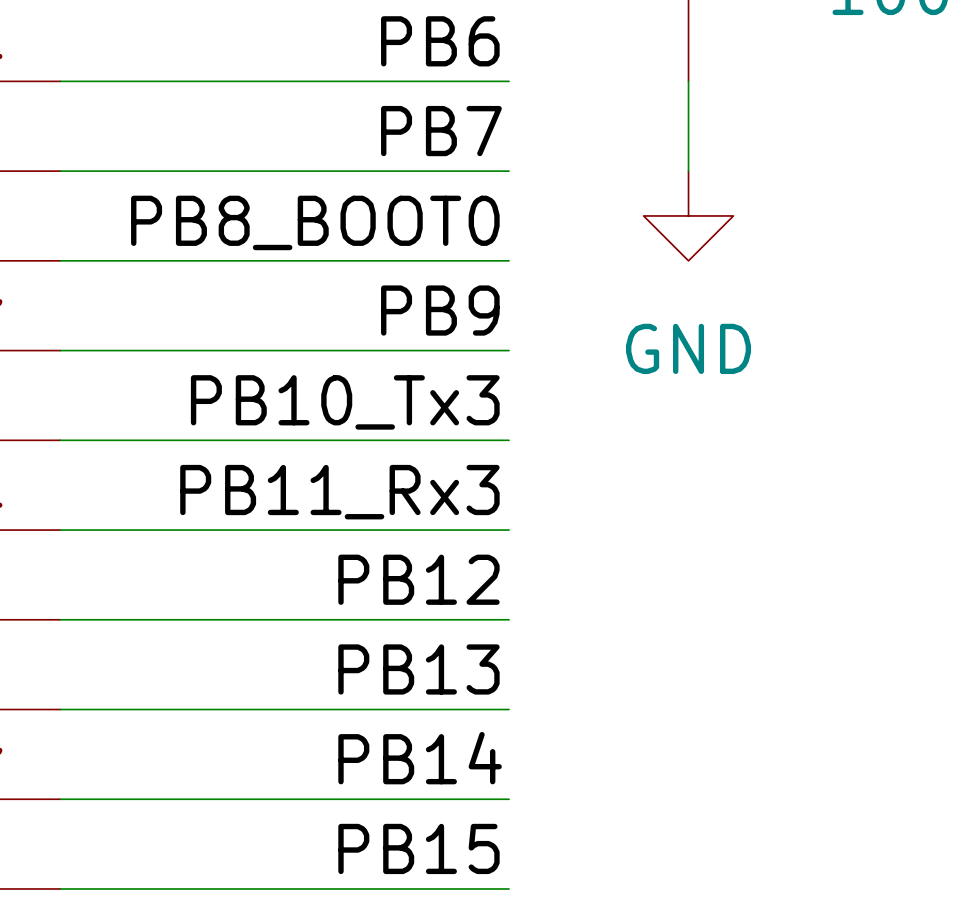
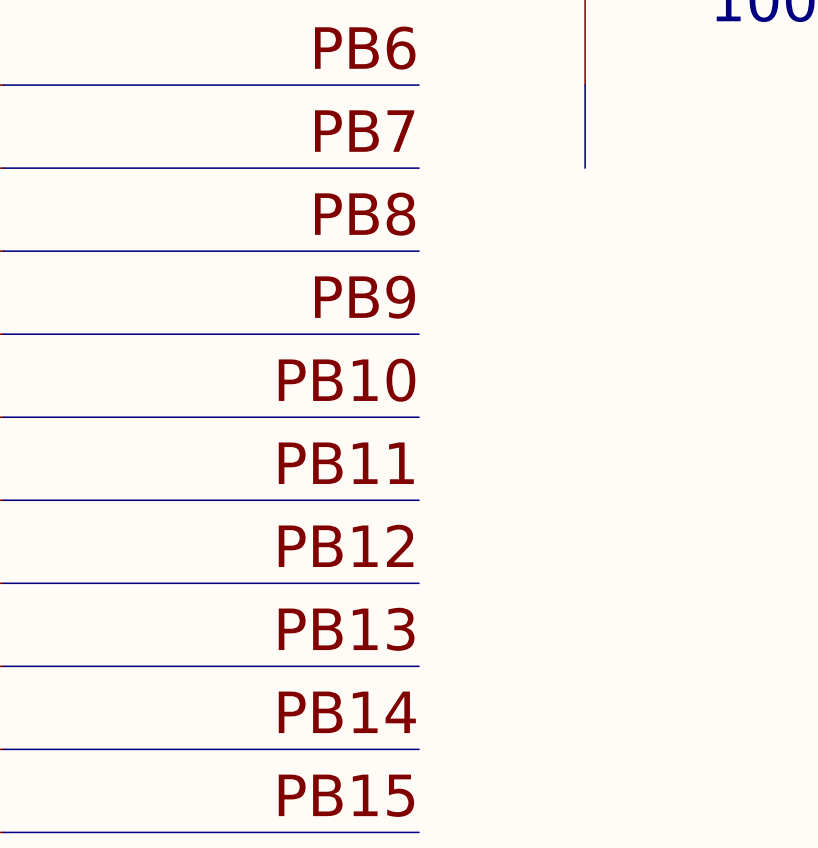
power symbol: GND (688, 215) -> none
label: PB8_BOOT0 (315, 222) -> PB8 (365, 214)
label: PB10_Tx3 (345, 402) -> PB10 (347, 380)
label: PB11_Rx3 (339, 492) -> PB11 (346, 463)

